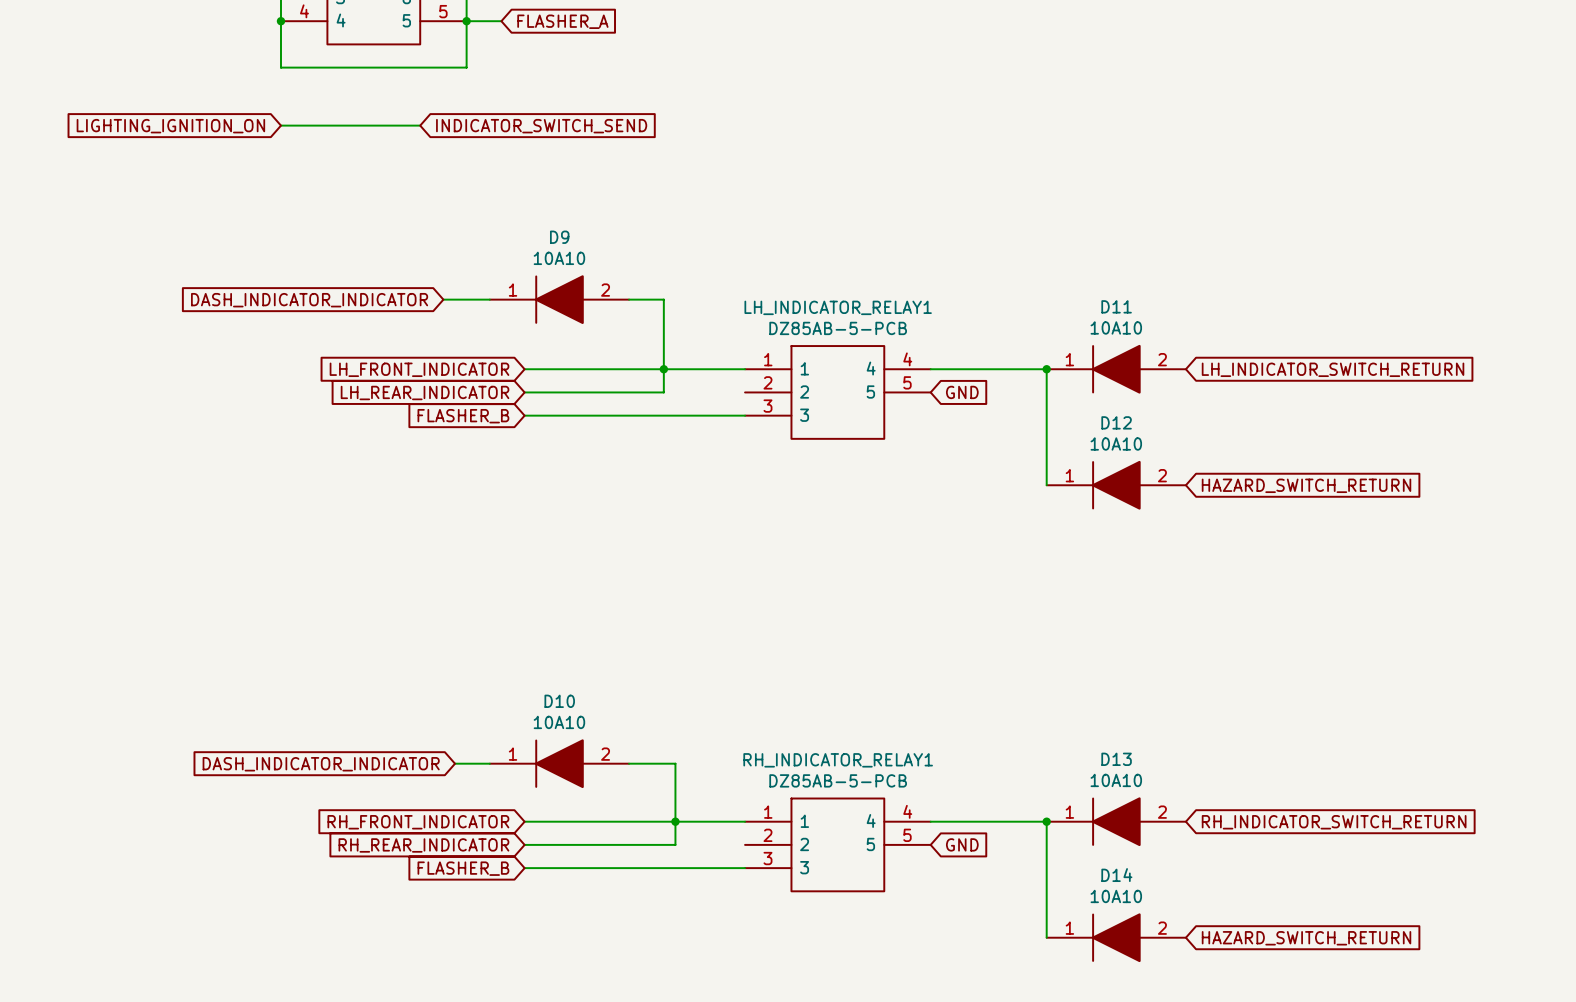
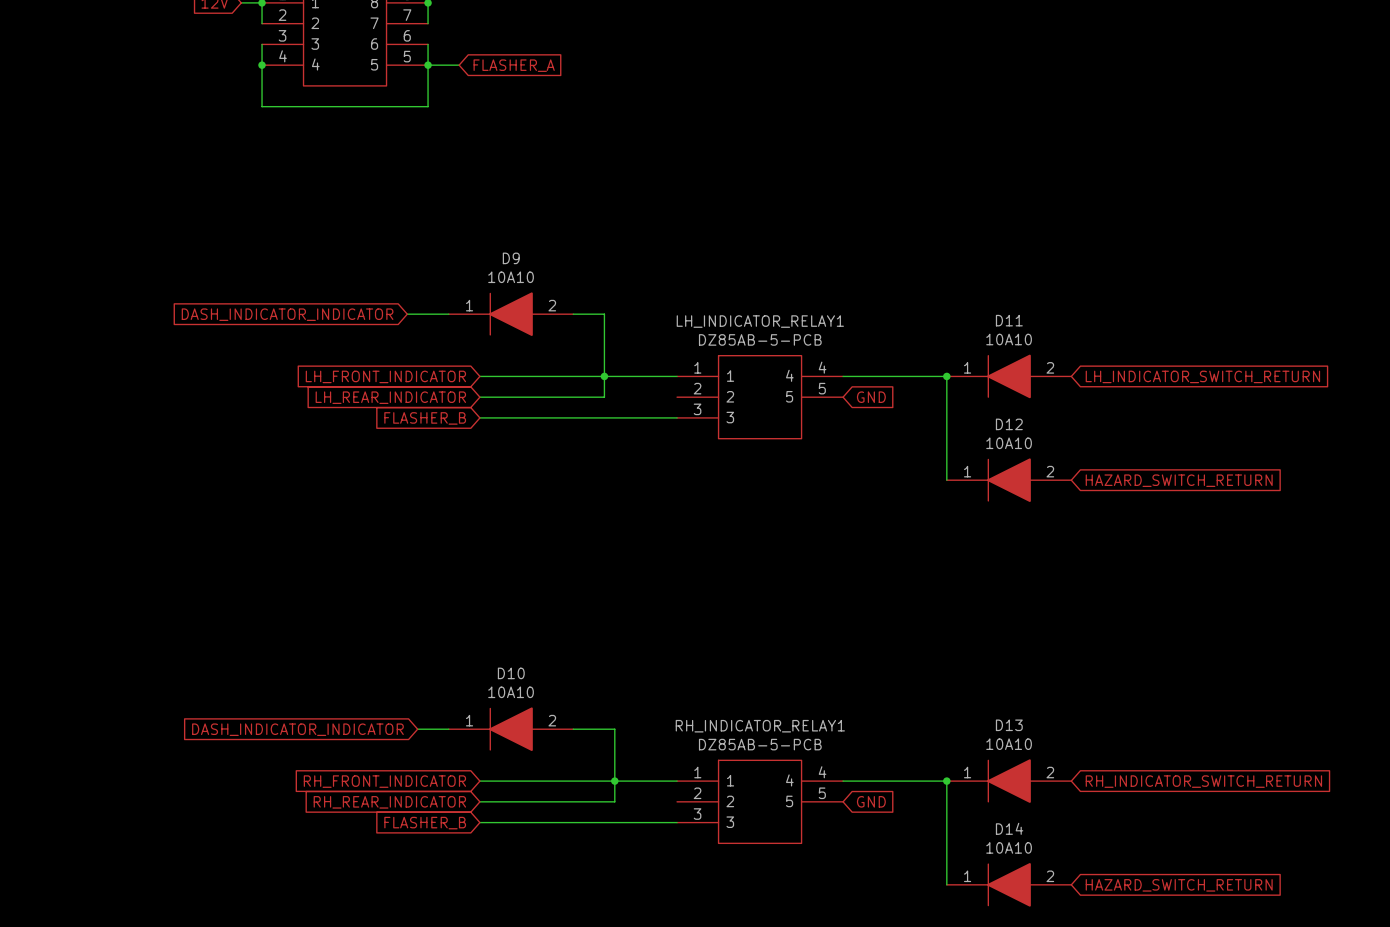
wire: (280, 125) (420, 125) -> none
global label: LIGHTING_IGNITION_ON (170, 126) -> none
global label: INDICATOR_SWITCH_SEND (541, 126) -> none

